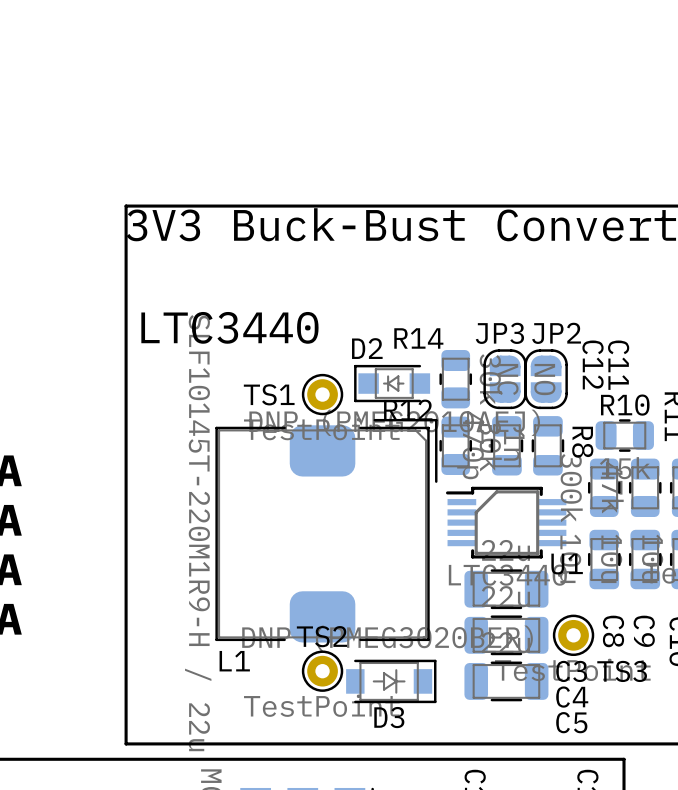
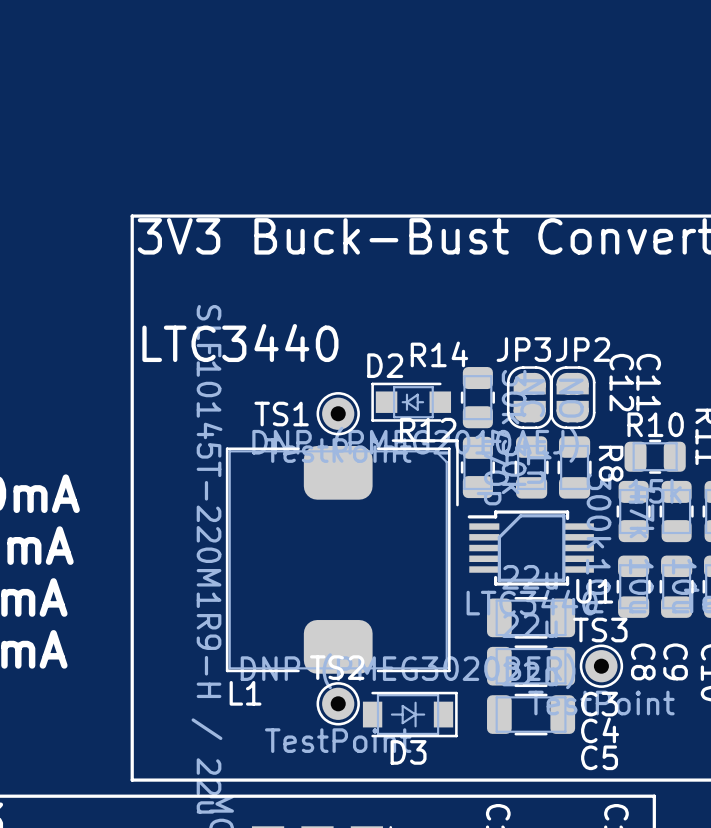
TS3 name position: TS3 (622, 671) -> TS3 (600, 630)

